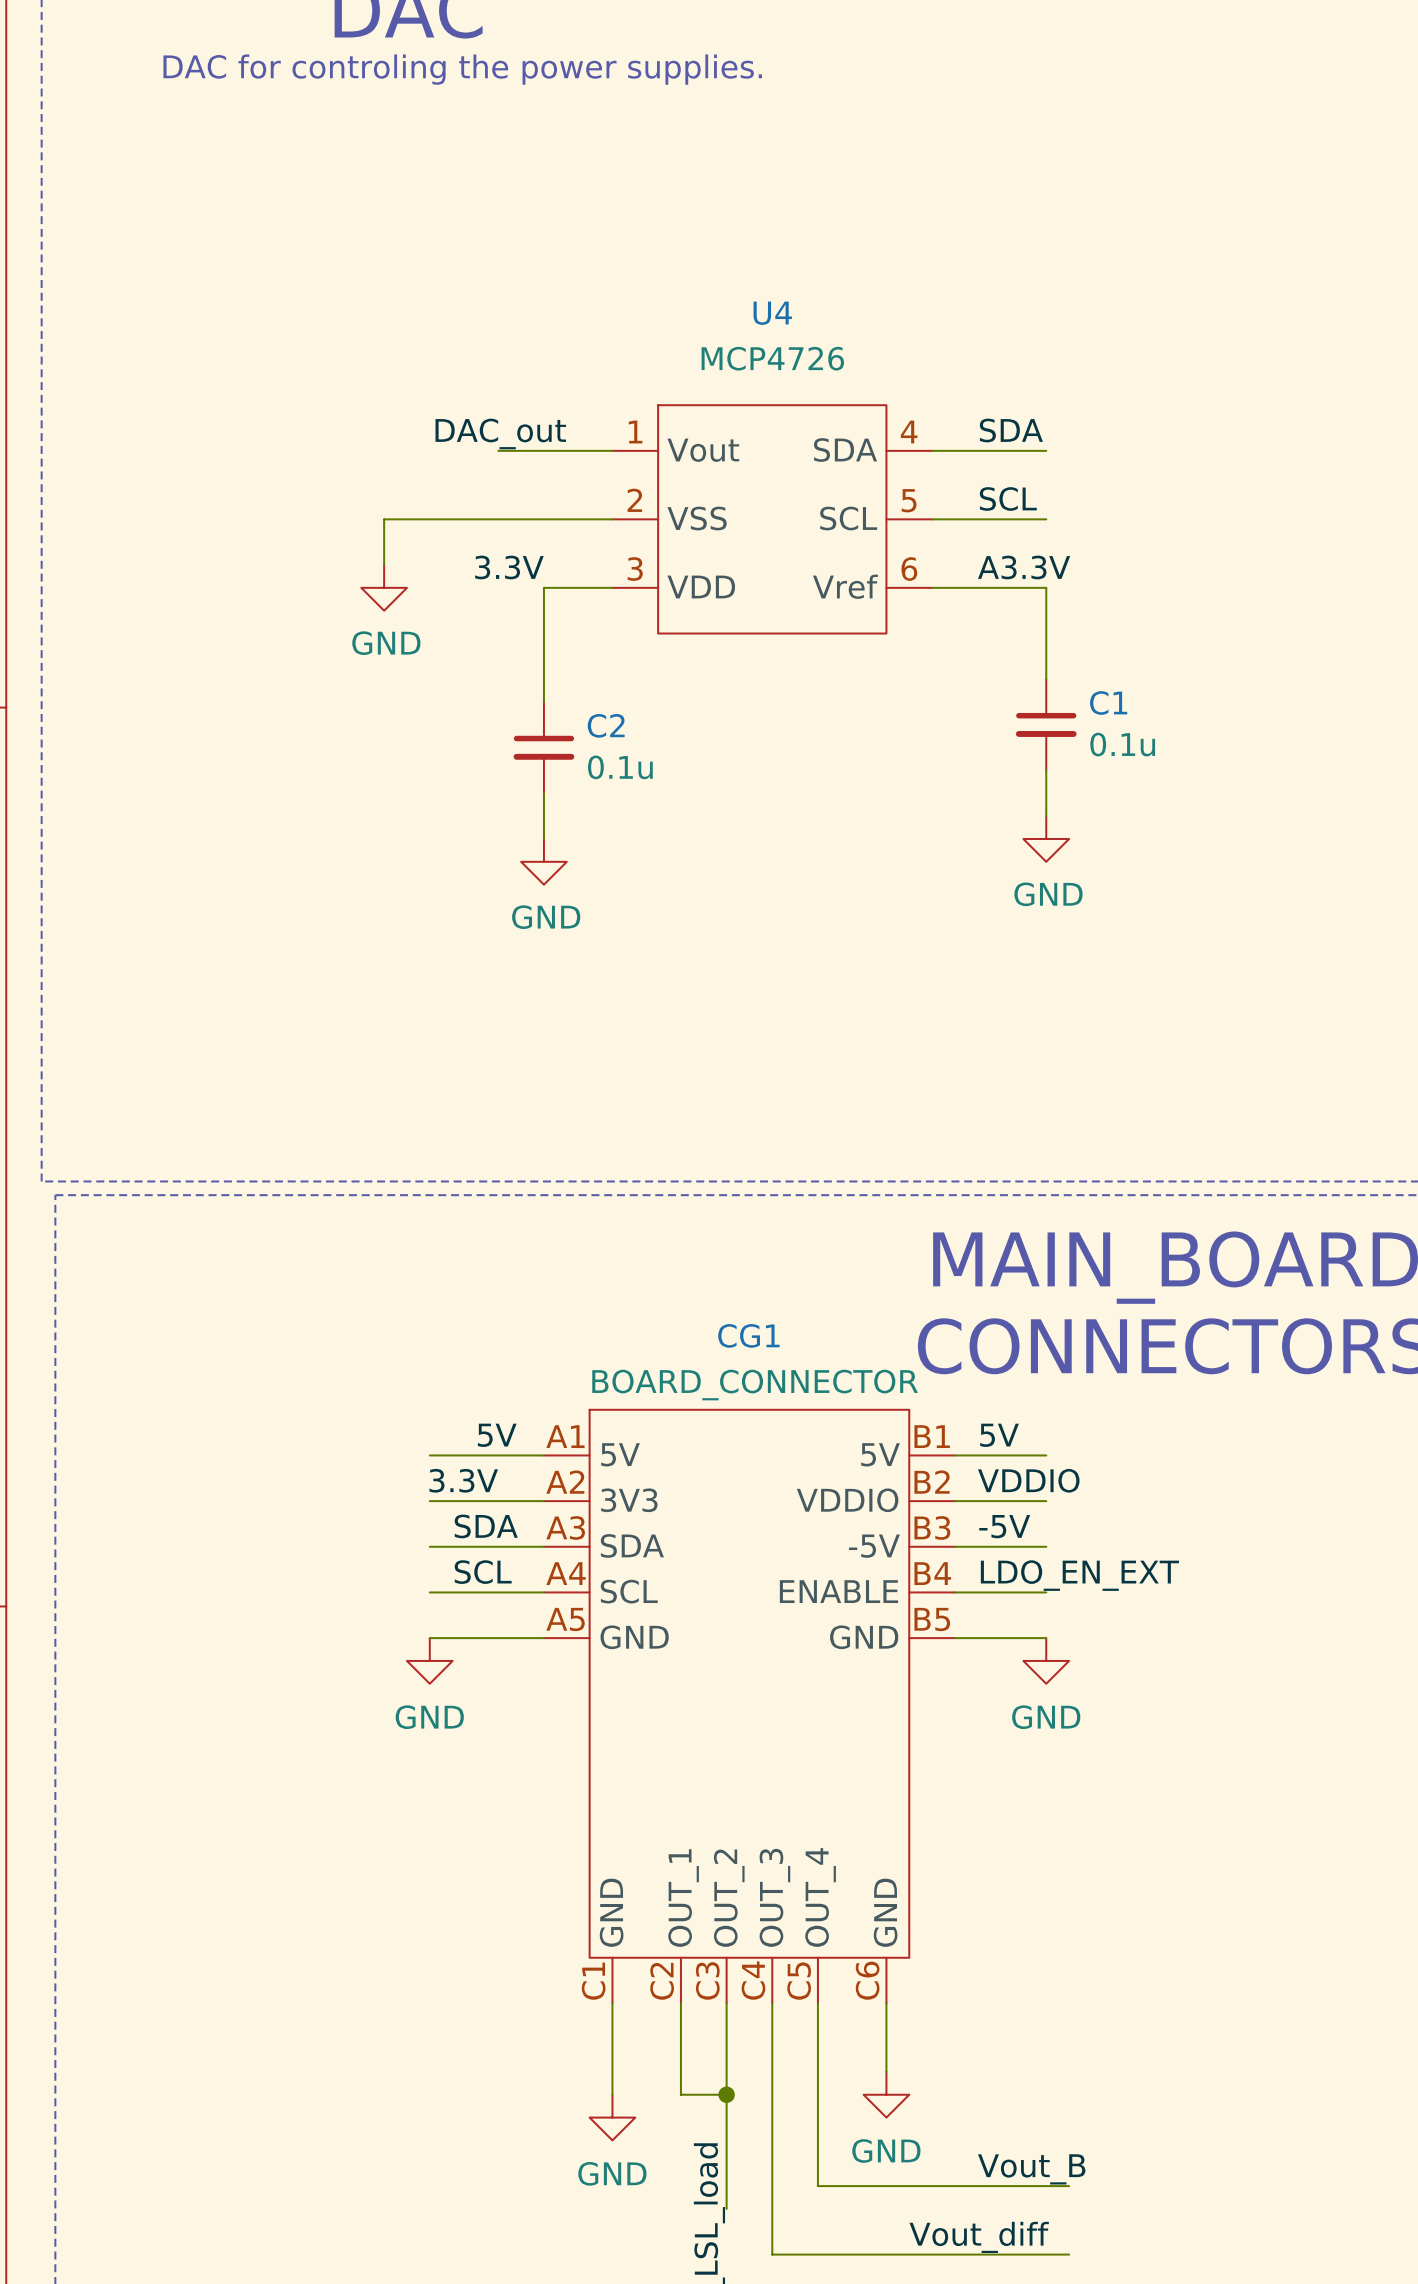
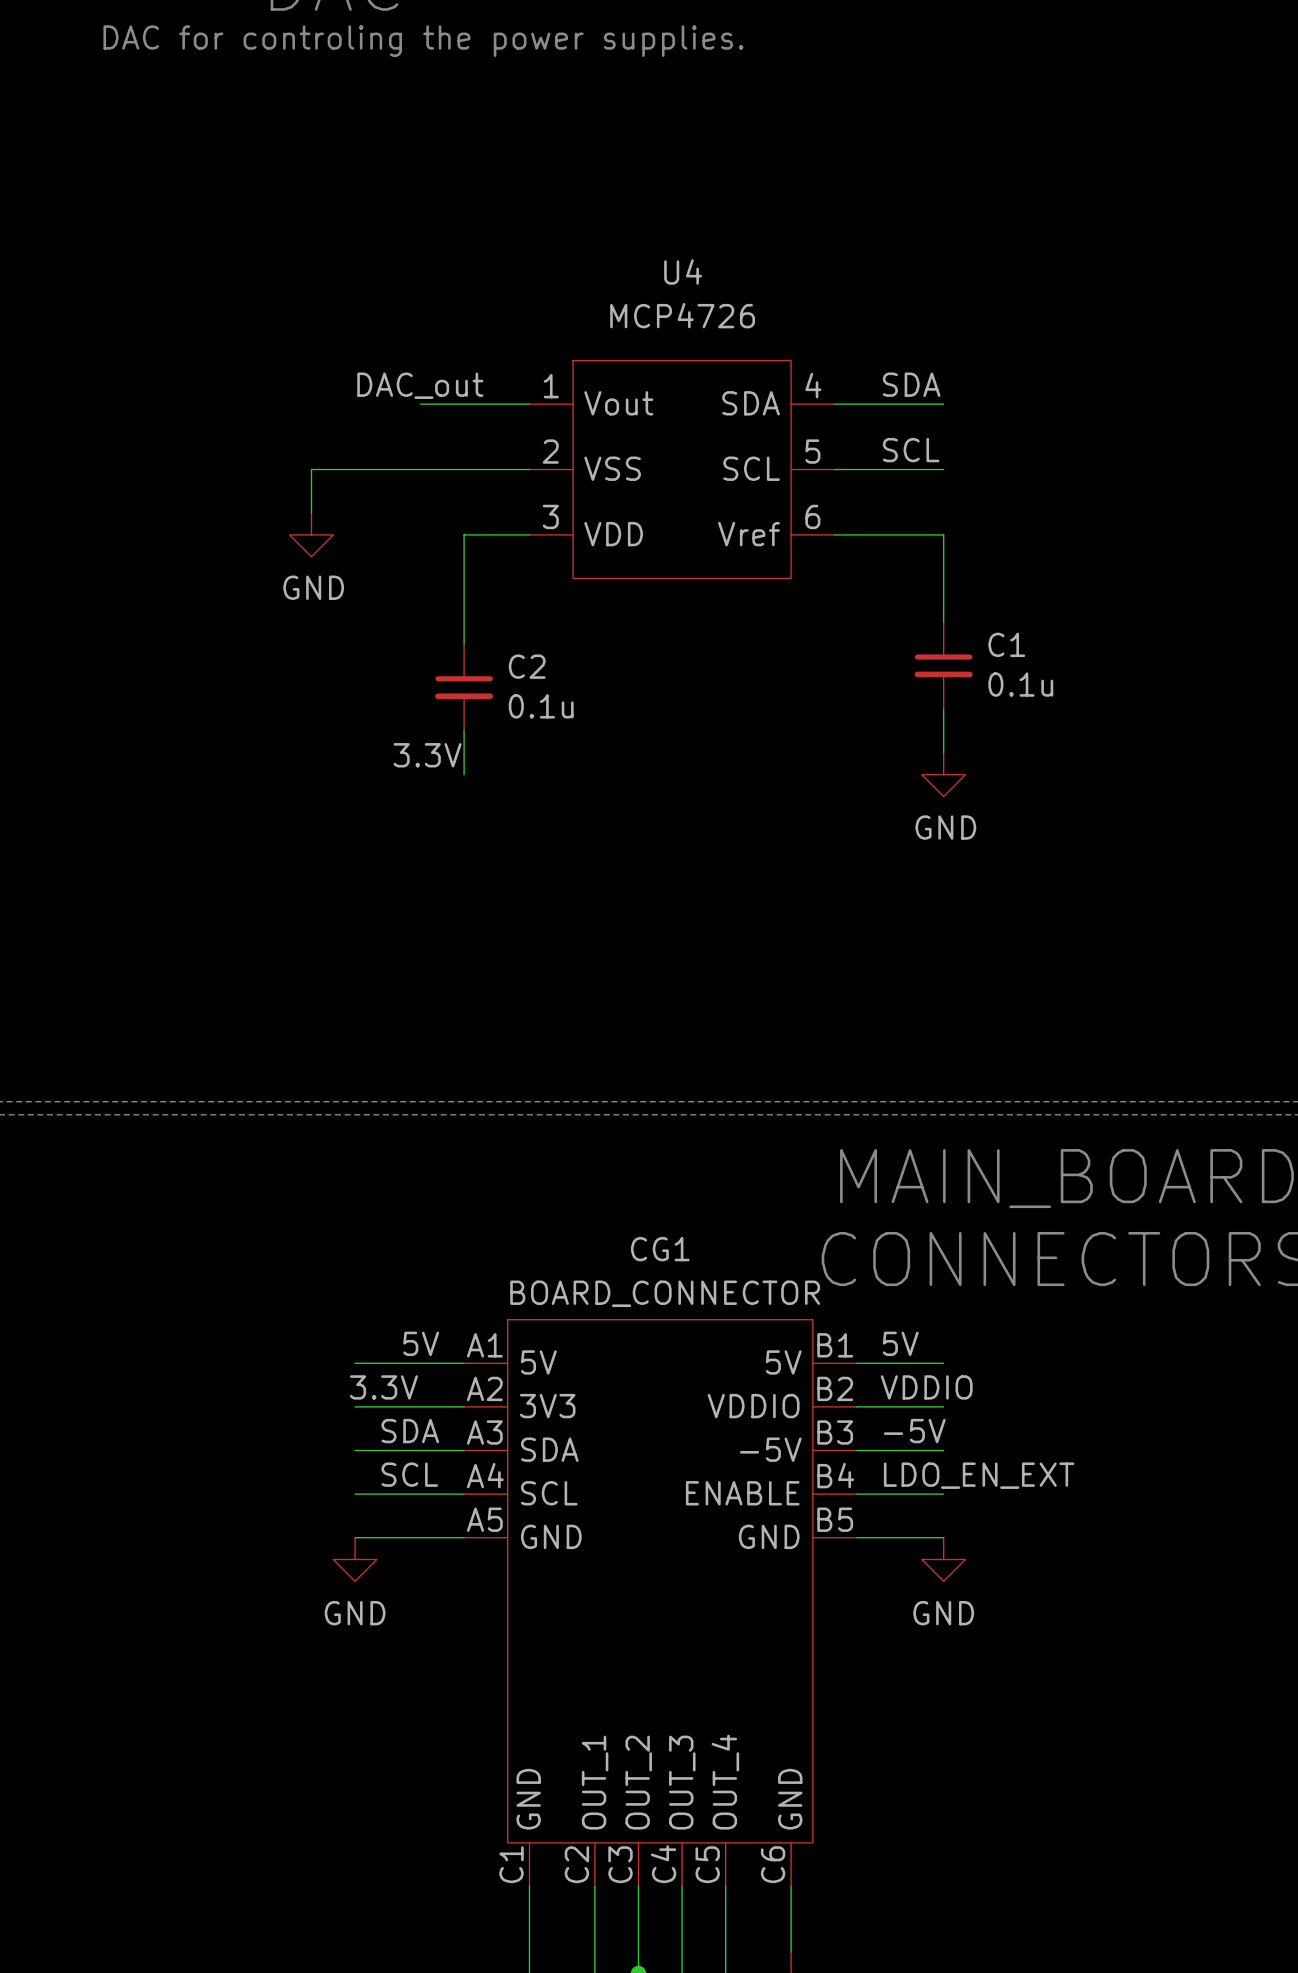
label position: 3.3V (509, 567) -> 3.3V (427, 755)
label: A3.3V (1024, 567) -> none
power symbol: GND (543, 861) -> none

